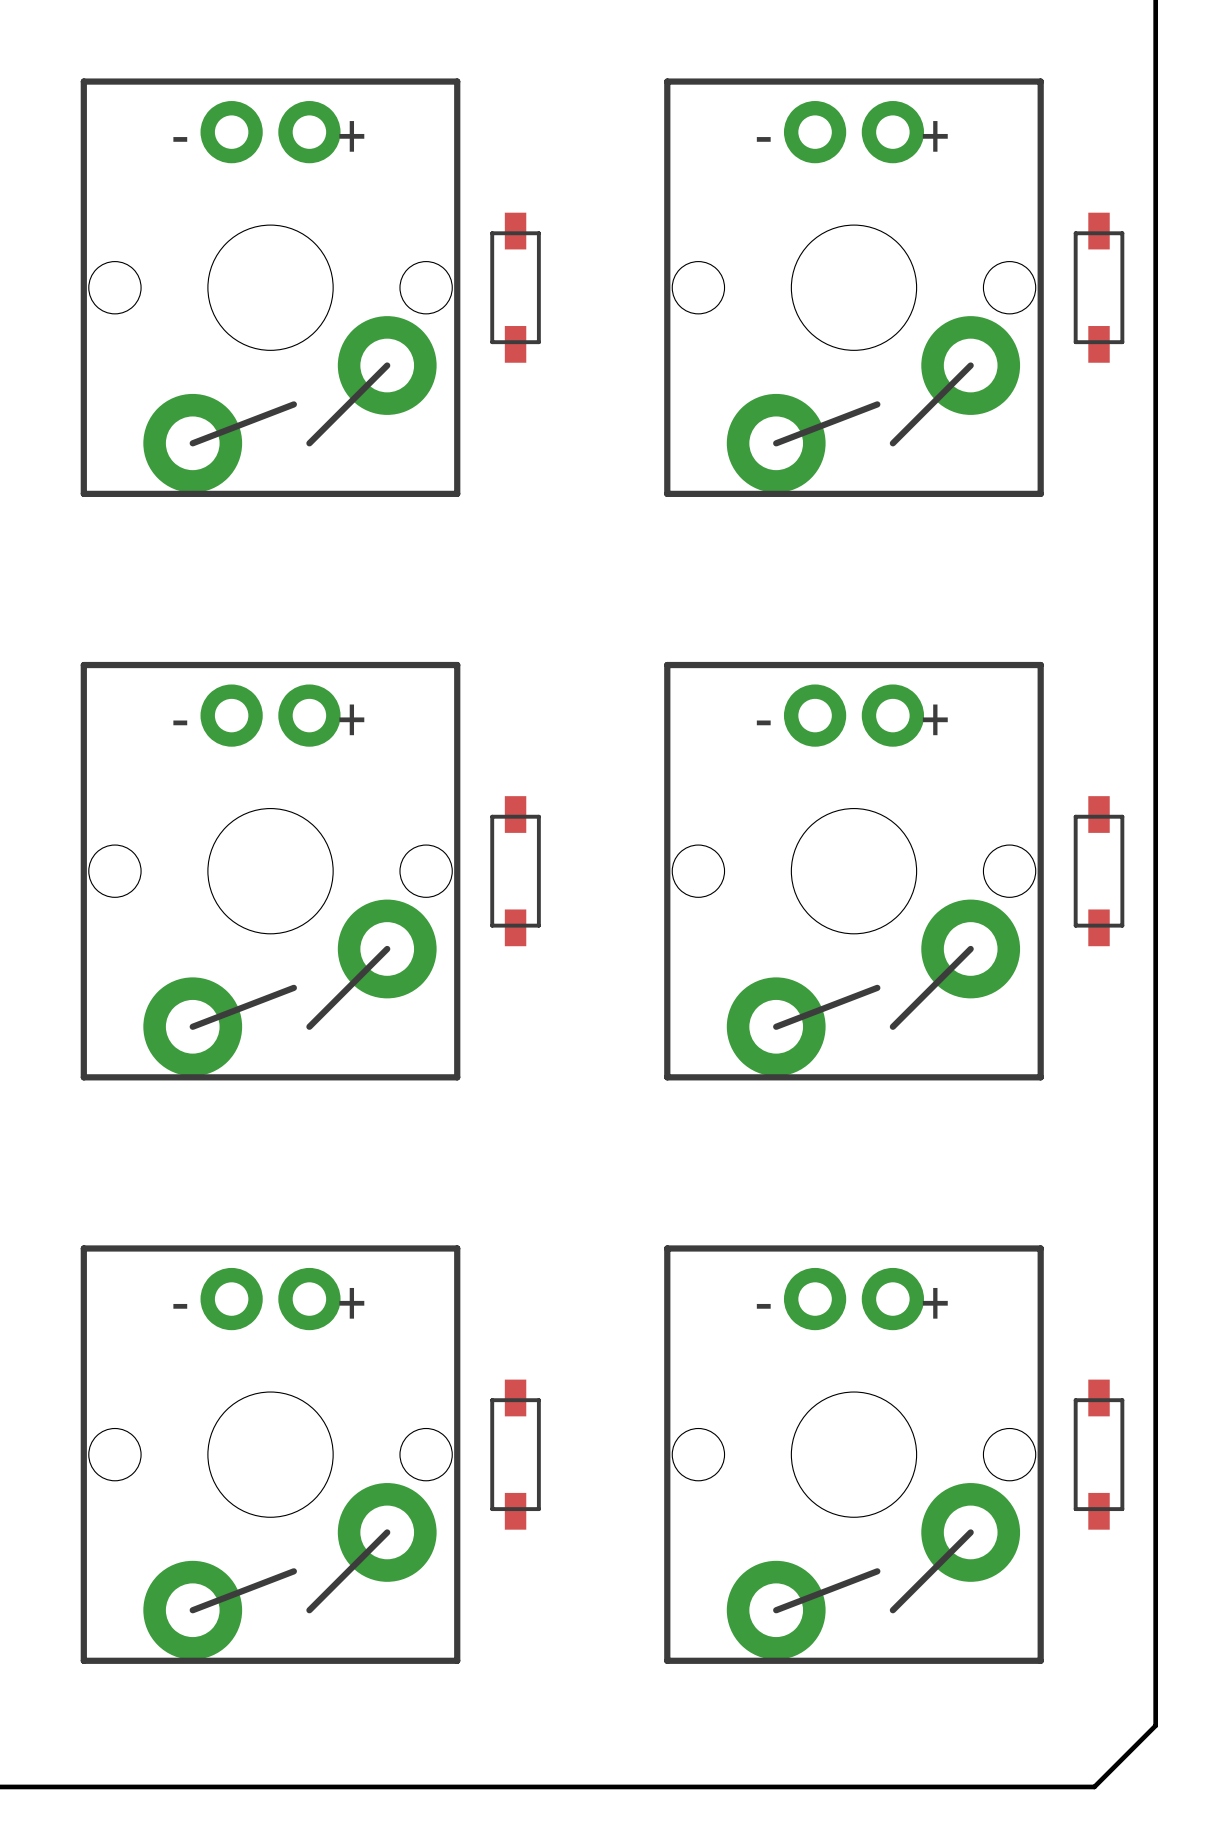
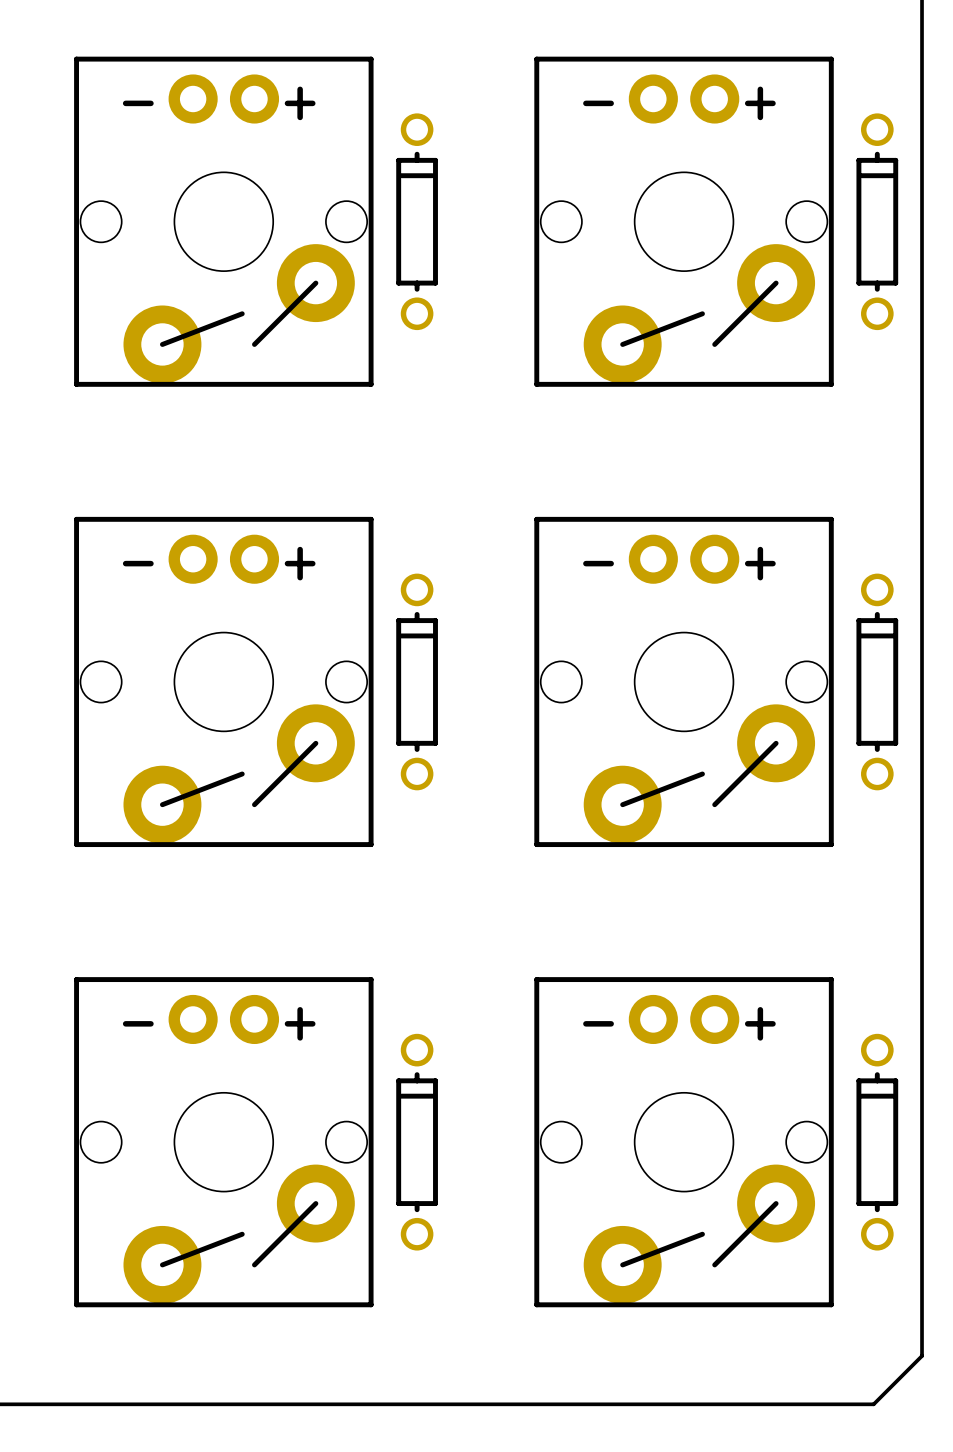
part footprint: [490, 212, 541, 363] -> [396, 113, 438, 331]
part footprint: [1073, 212, 1125, 363] -> [856, 113, 899, 331]
part footprint: [490, 796, 541, 947] -> [396, 573, 438, 791]
part footprint: [1073, 796, 1125, 947] -> [856, 573, 899, 791]
part footprint: [490, 1379, 541, 1530] -> [396, 1033, 438, 1251]
part footprint: [1073, 1379, 1125, 1530] -> [856, 1033, 899, 1251]

